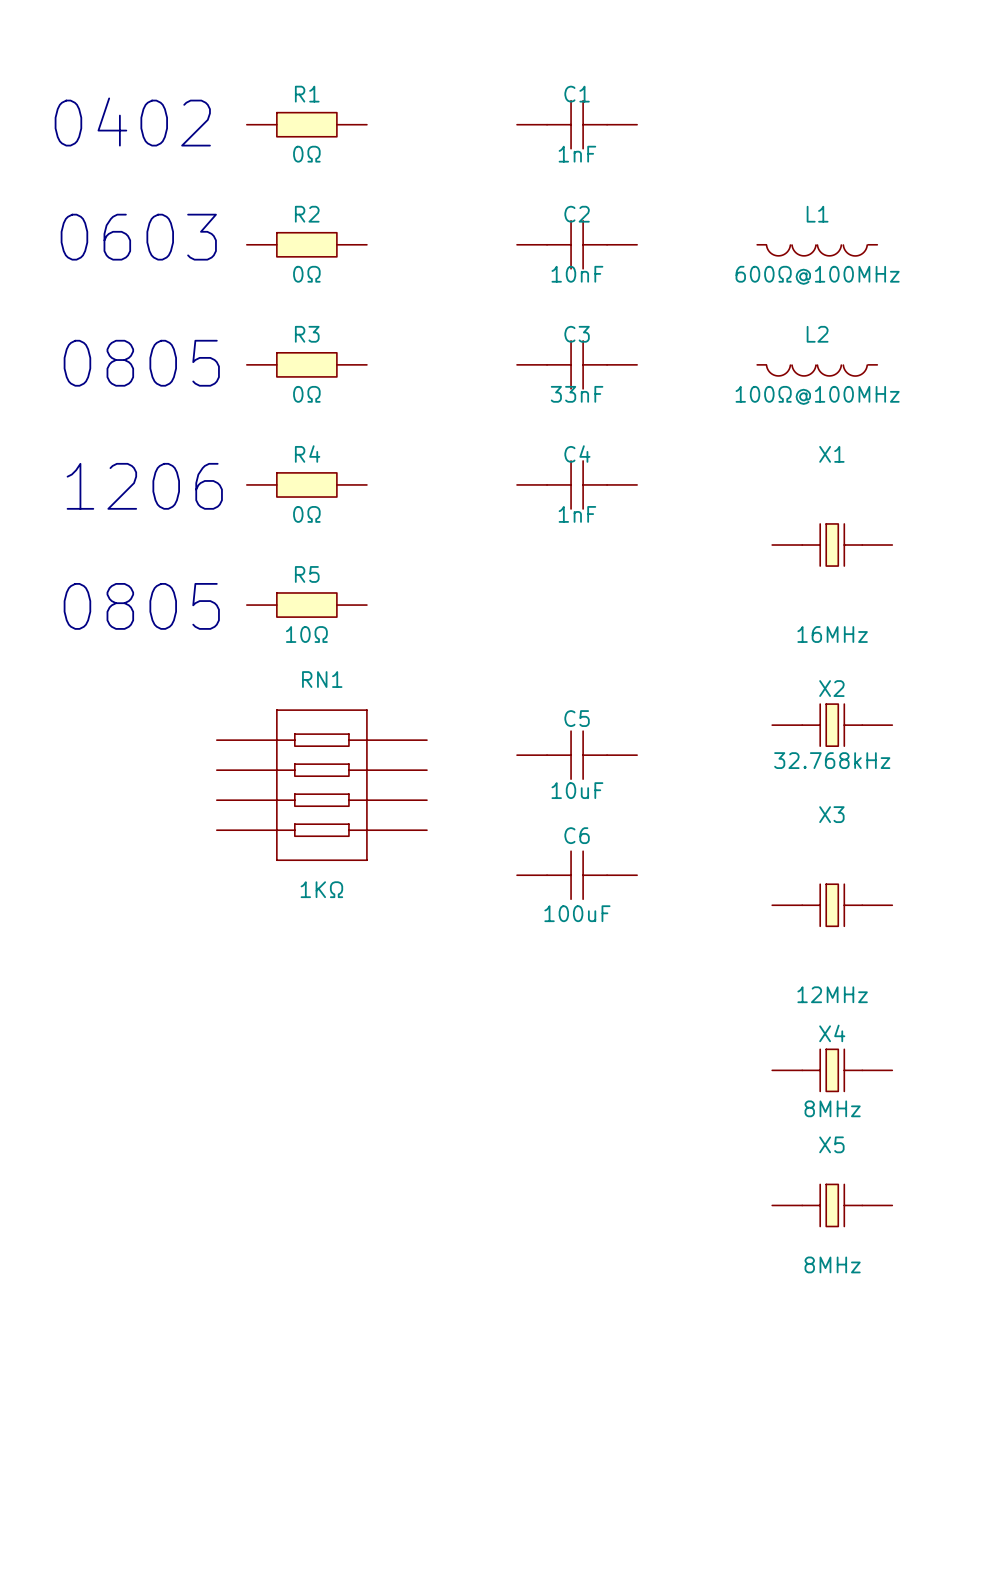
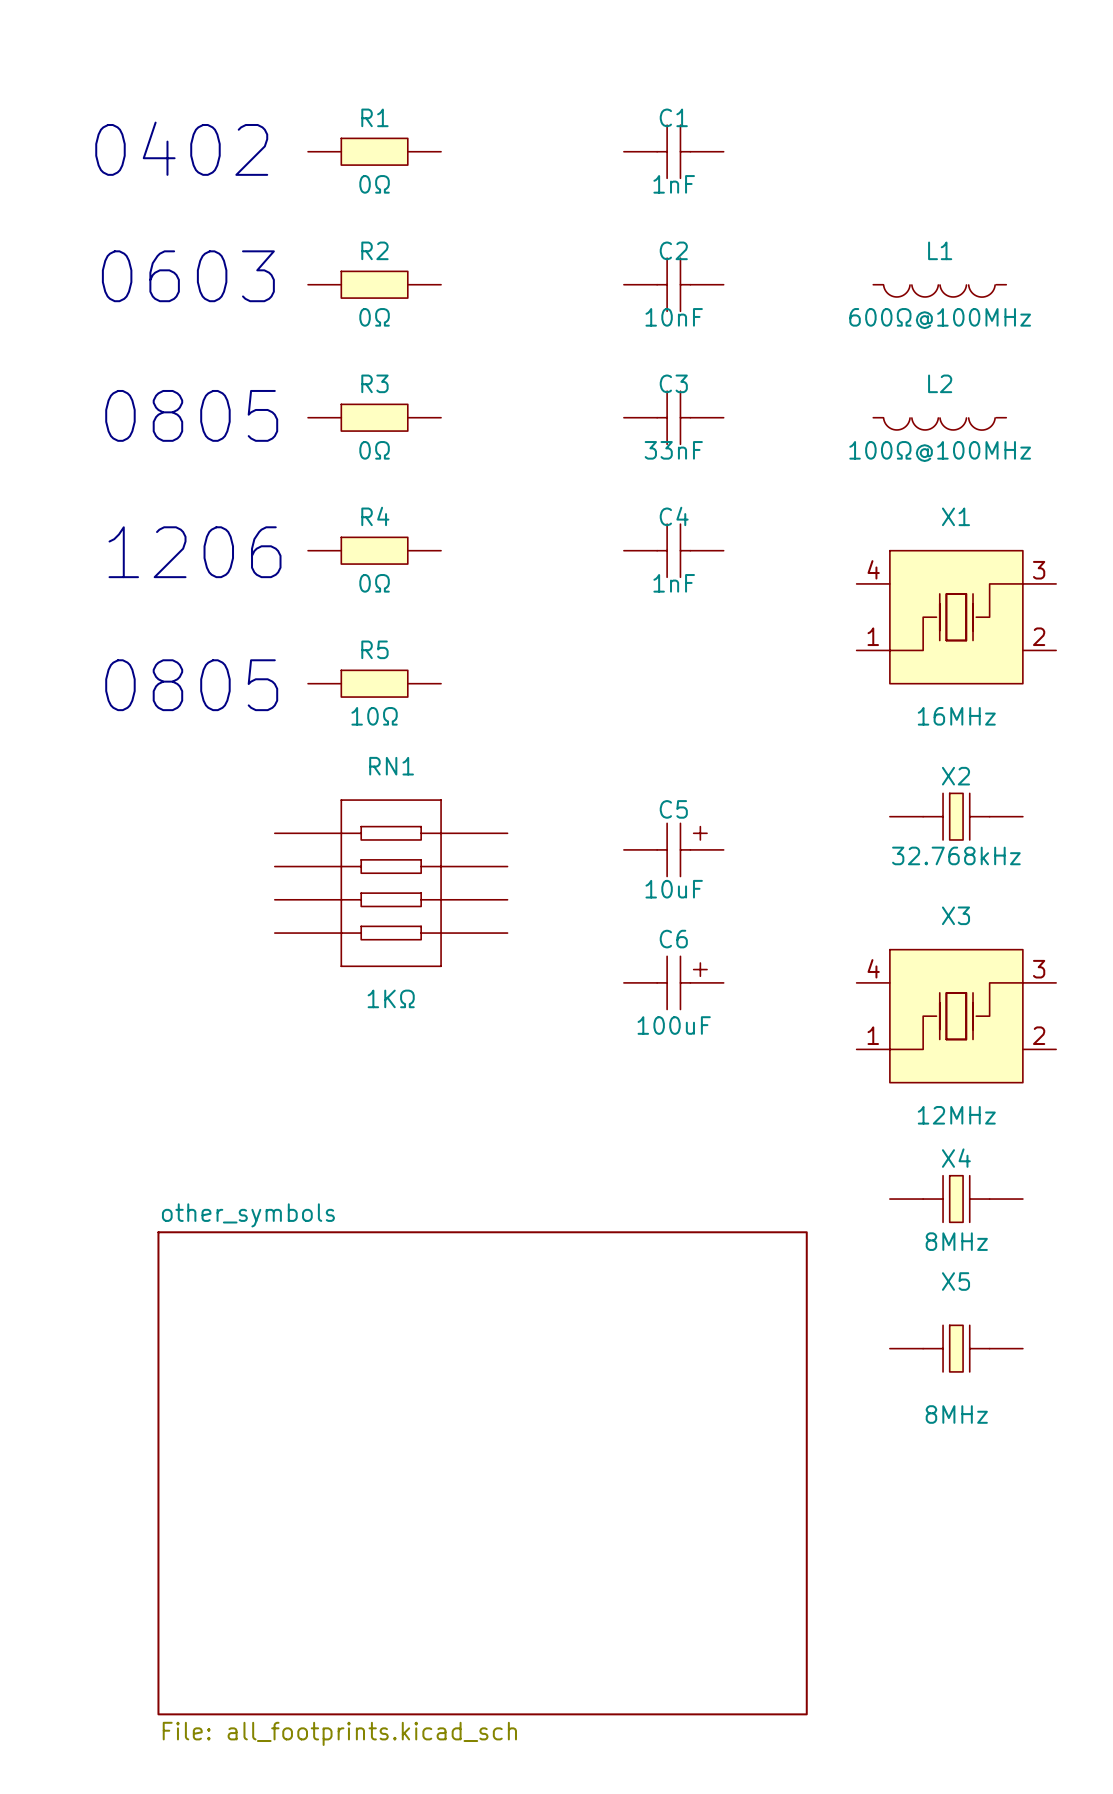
C1 symbol: [517, 100, 638, 149] -> [623, 125, 724, 179]
C2 symbol: [517, 220, 638, 269] -> [623, 258, 724, 312]
C3 symbol: [517, 340, 638, 389] -> [623, 391, 724, 445]
C4 symbol: [517, 460, 638, 509] -> [623, 524, 724, 578]
X1 symbol: [772, 523, 893, 567] -> [856, 550, 1057, 684]
C5 symbol: [517, 731, 638, 780] -> [623, 823, 724, 877]
C6 symbol: [517, 851, 638, 900] -> [623, 956, 724, 1010]
X3 symbol: [772, 884, 893, 927] -> [856, 949, 1057, 1083]
sheet other_symbols: none -> File: all_footprints.kicad_sch (482, 1473)

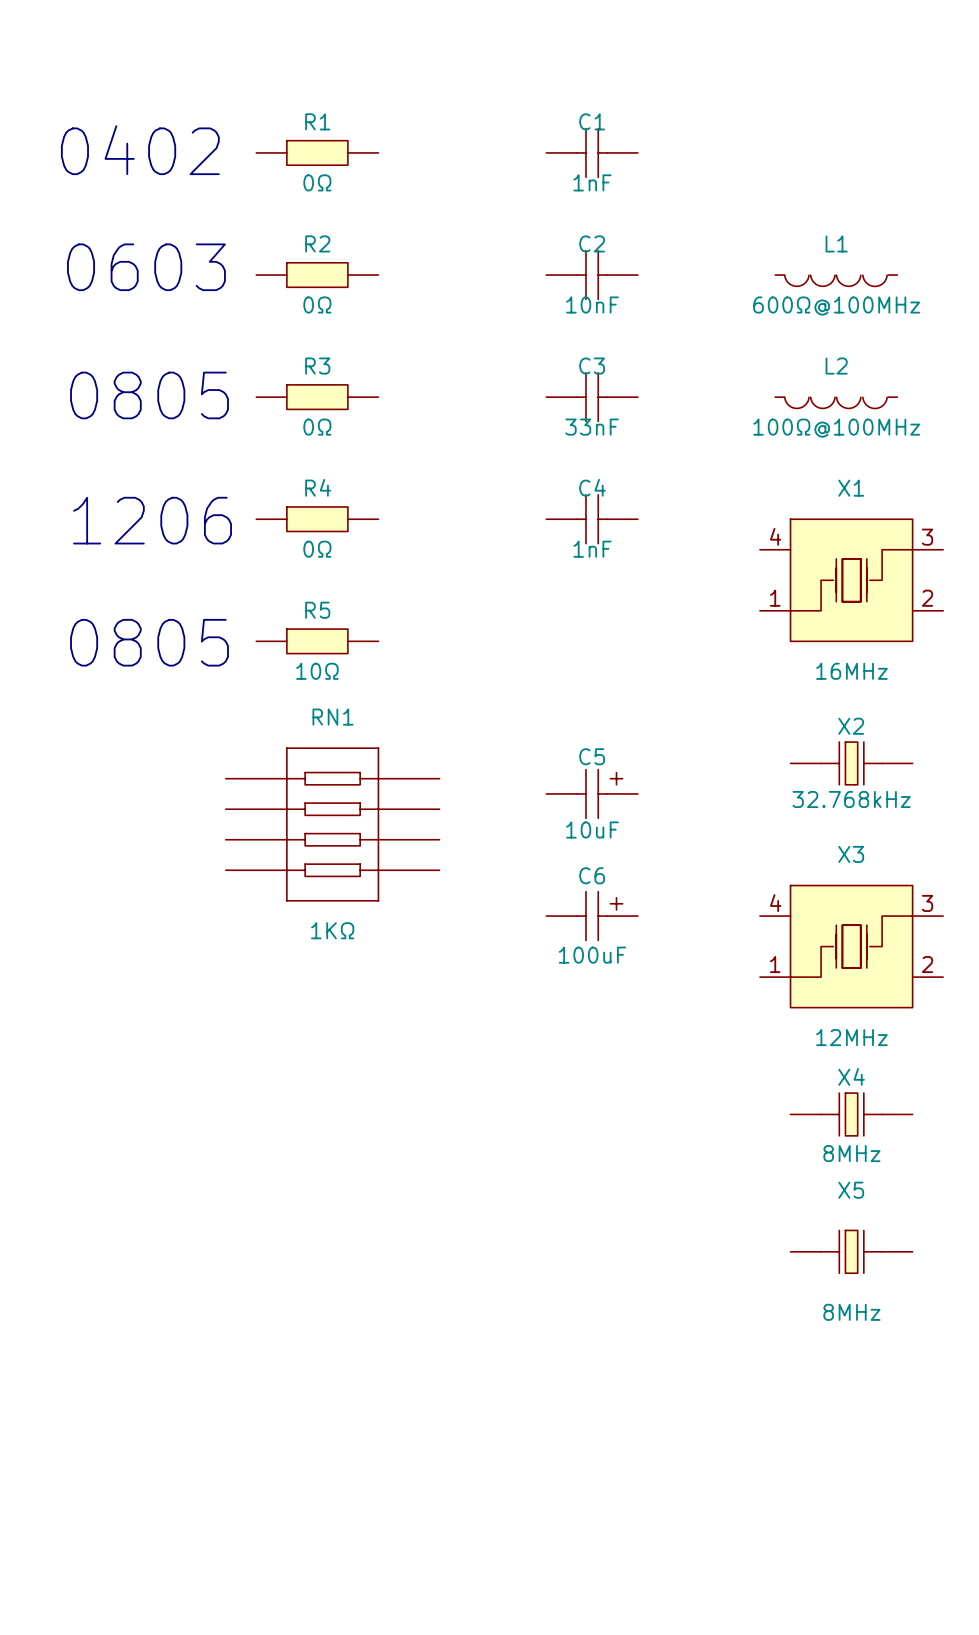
sheet other_symbols: File: all_footprints.kicad_sch (482, 1473) -> none

